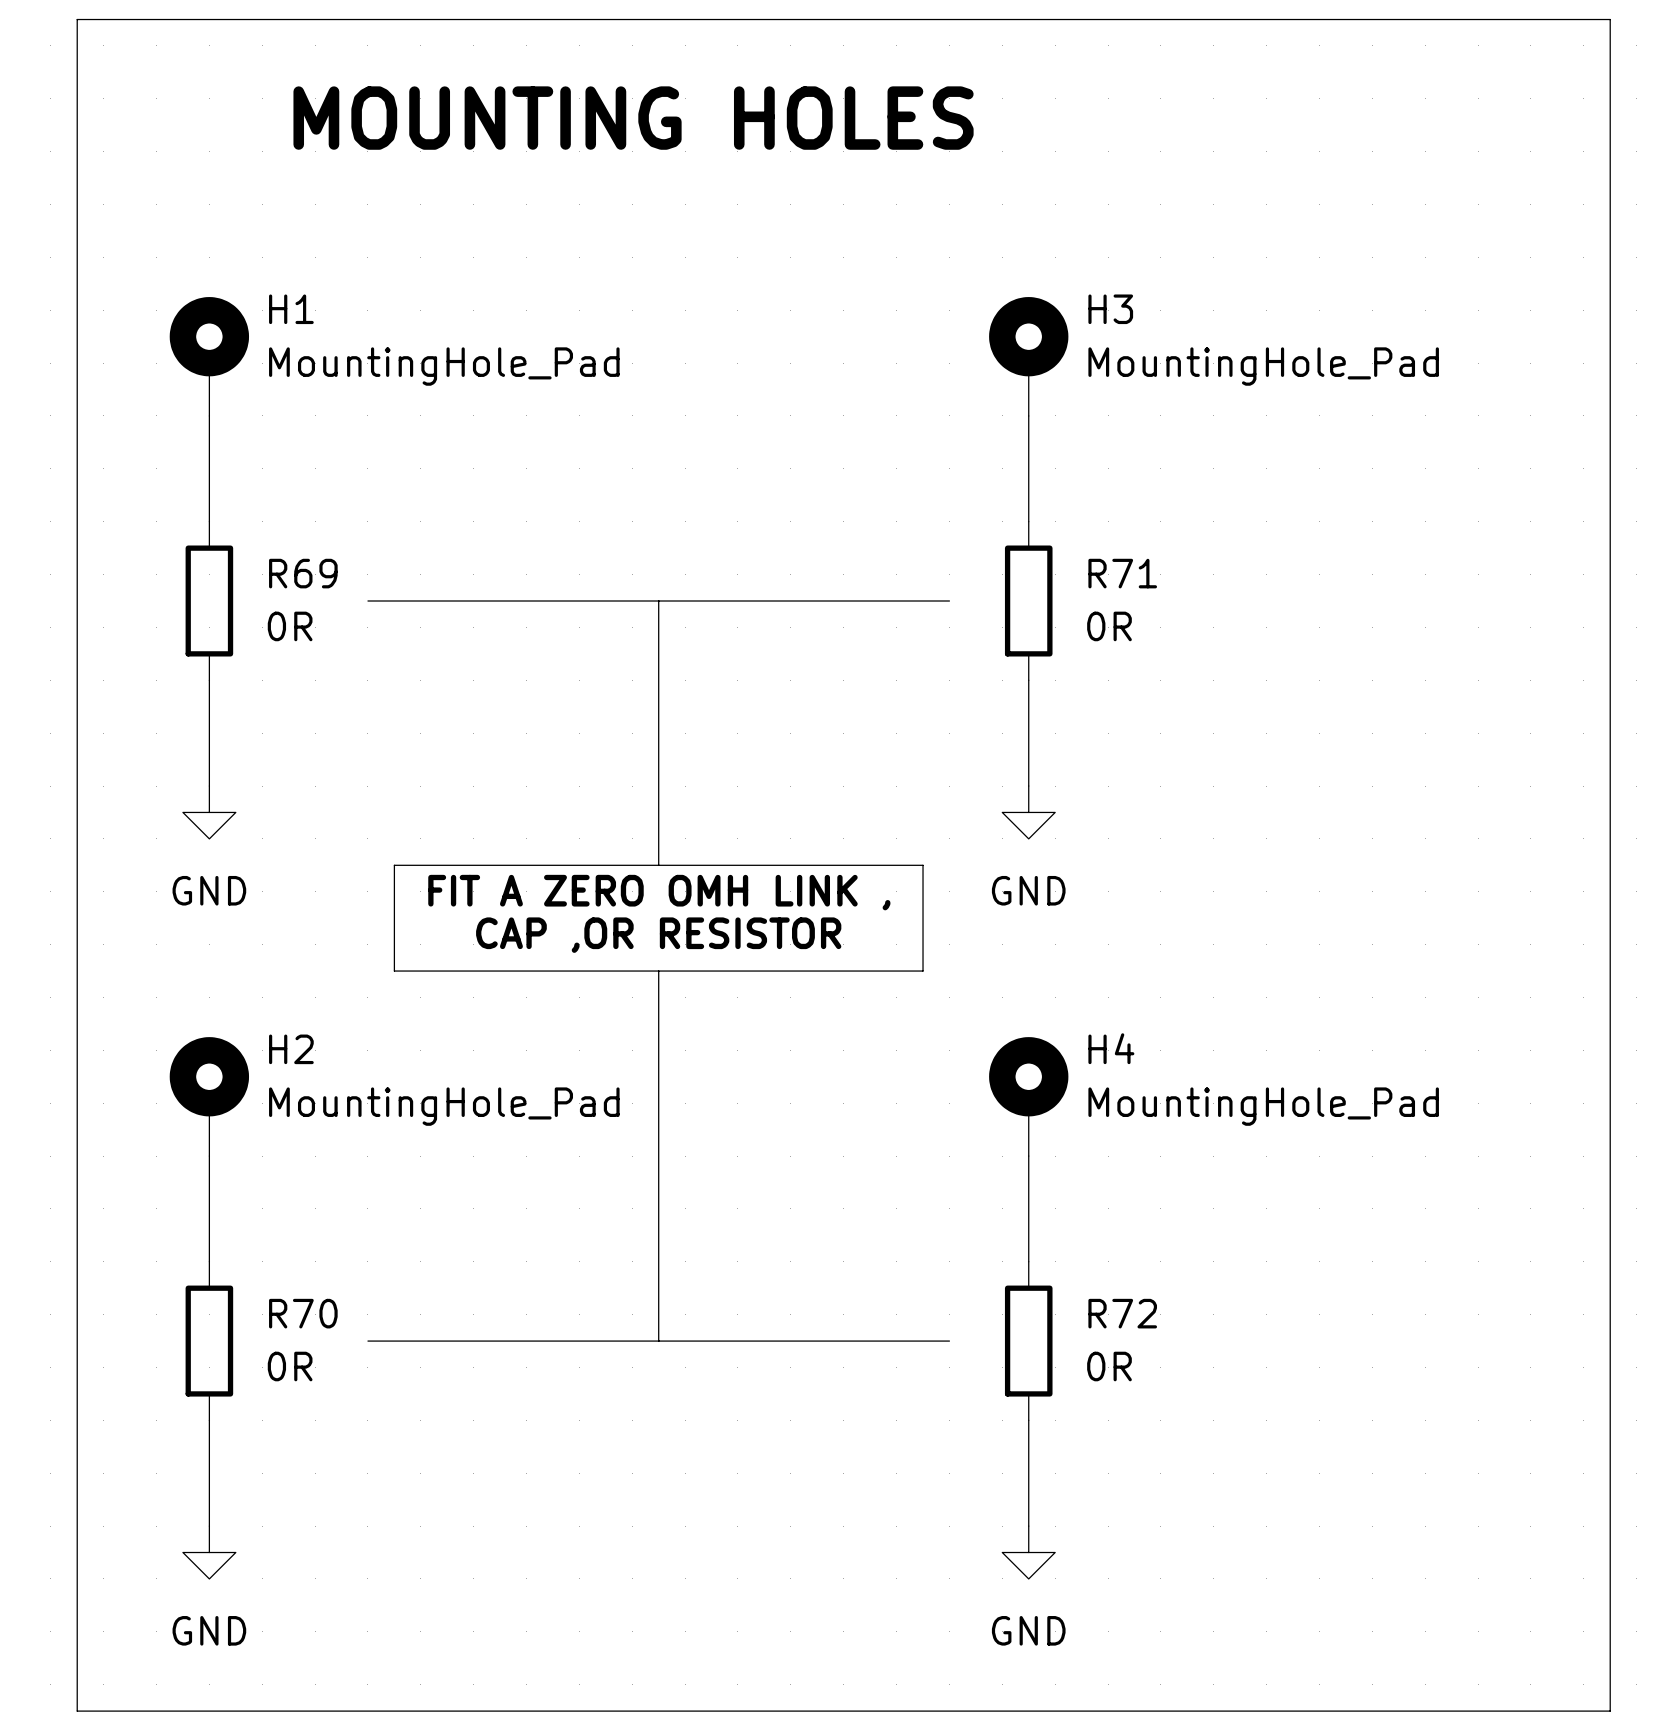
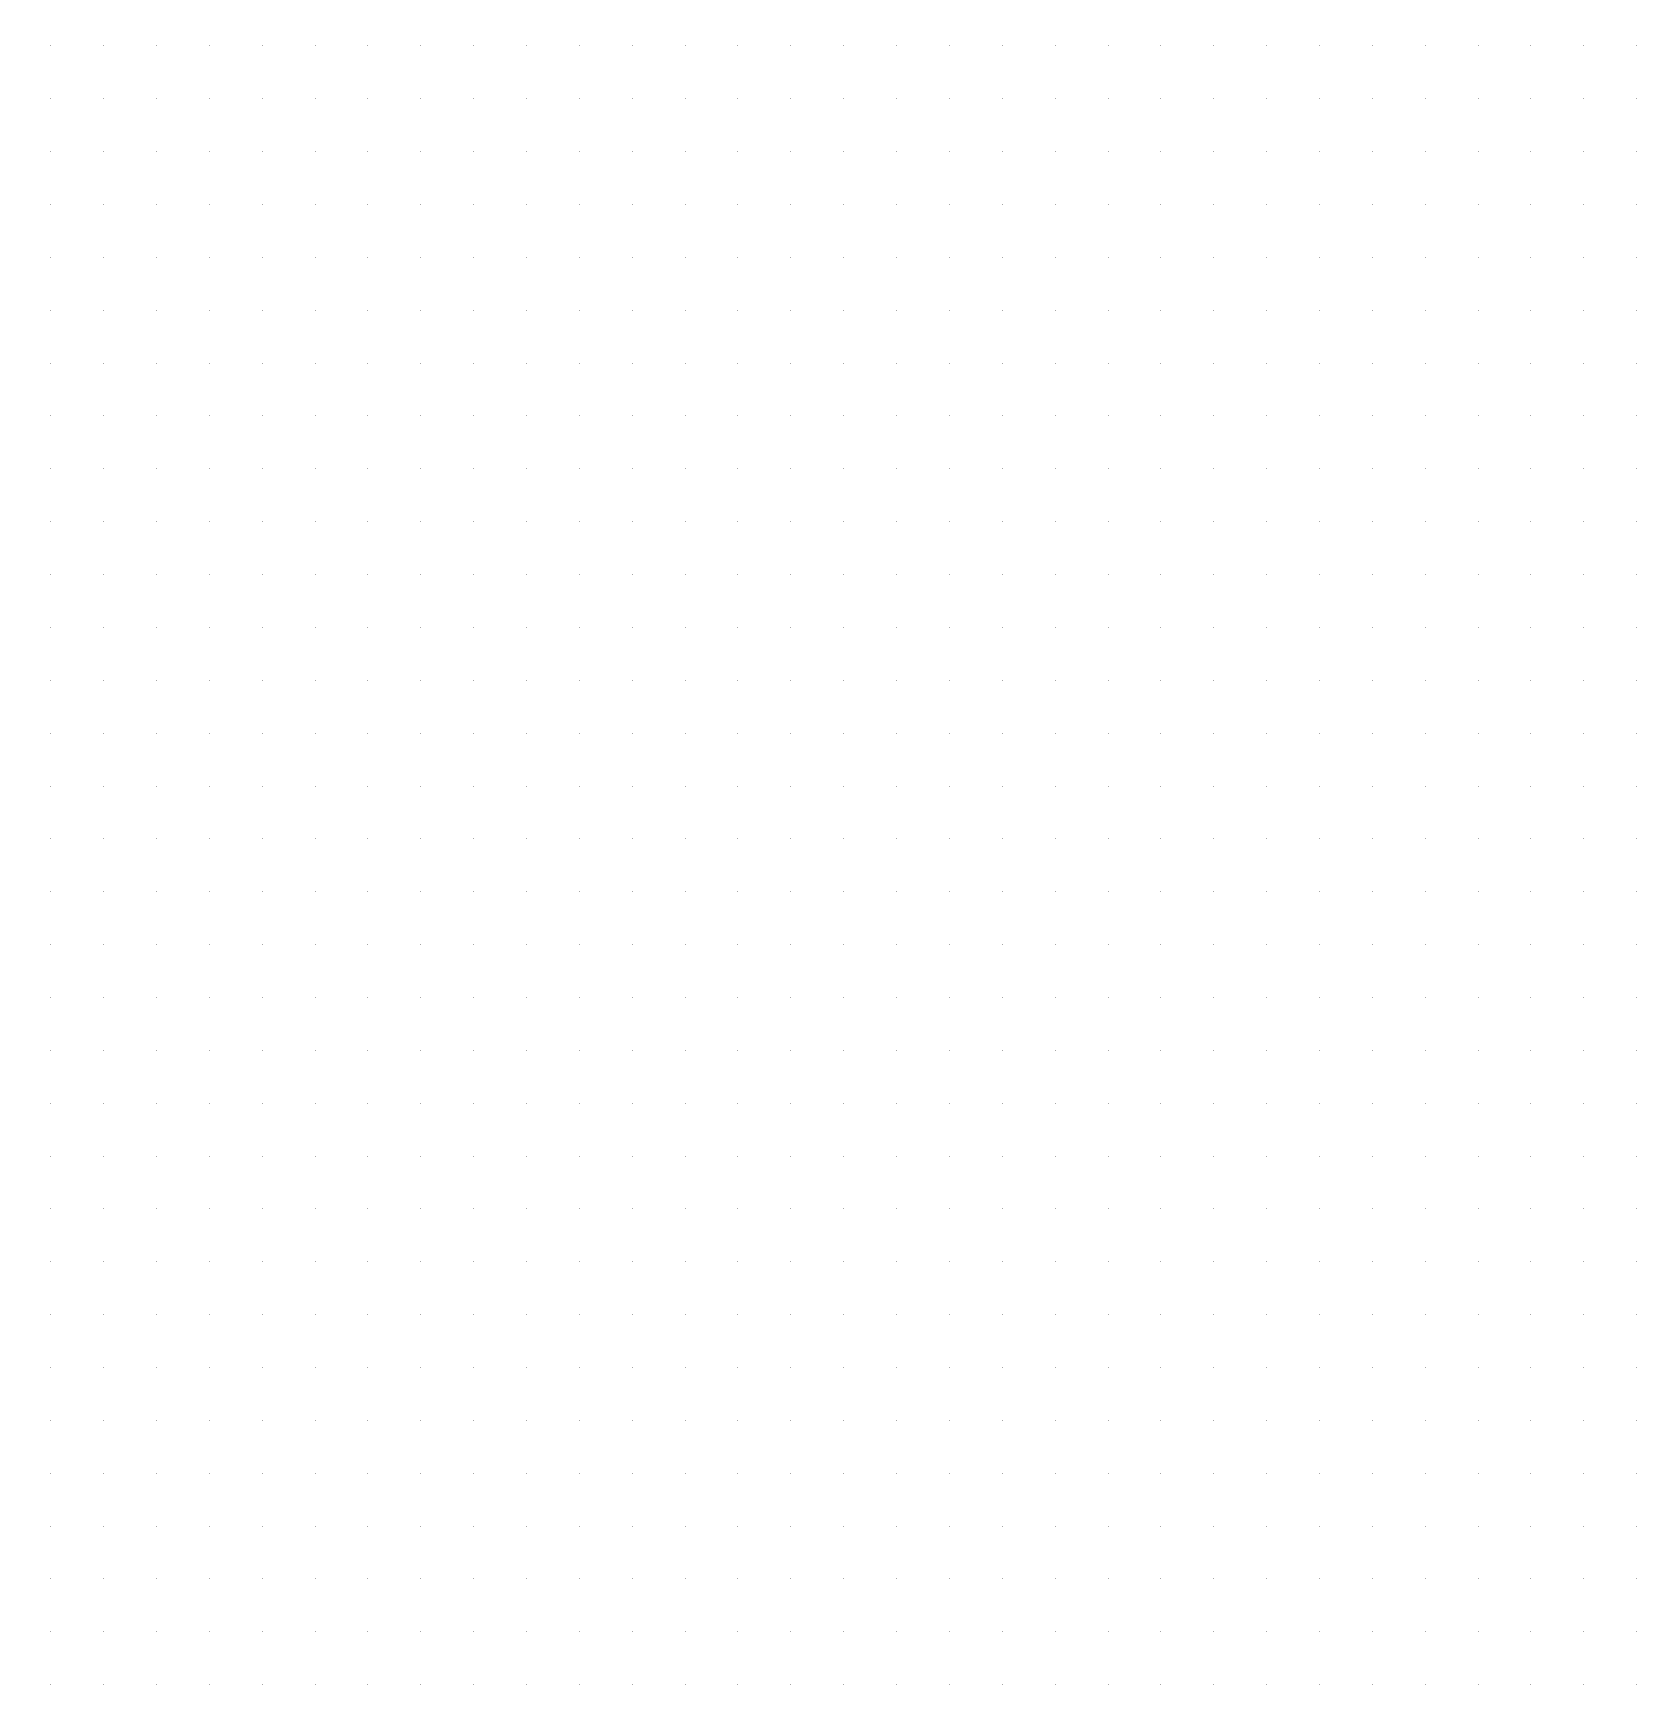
line: (77, 19) (1610, 19) (1610, 1711) (77, 1711) (77, 19) -> none
text: MOUNTING HOLES (633, 118) -> none
H1: MountingHole_Pad (209, 356) -> none
H3: MountingHole_Pad (1028, 356) -> none
wire: (209, 415) (209, 521) -> none
wire: (1028, 415) (1028, 521) -> none
R69: 0R (209, 601) -> none
line: (367, 601) (949, 601) -> none
line: (658, 601) (658, 865) -> none
R71: 0R (1028, 601) -> none
wire: (209, 680) (209, 786) -> none
wire: (1028, 680) (1028, 786) -> none
power symbol: GND (209, 812) -> none
power symbol: GND (1028, 812) -> none
line: (394, 865) (923, 865) (923, 971) (394, 971) (394, 865) -> none
text: FIT A ZERO OMH LINK , (659, 892) -> none
text: CAP ,OR RESISTOR (658, 935) -> none
line: (658, 971) (658, 1341) -> none
H2: MountingHole_Pad (209, 1096) -> none
H4: MountingHole_Pad (1028, 1096) -> none
wire: (209, 1156) (209, 1261) -> none
wire: (1028, 1156) (1028, 1261) -> none
R70: 0R (209, 1341) -> none
line: (367, 1341) (949, 1341) -> none
R72: 0R (1028, 1341) -> none
wire: (209, 1420) (209, 1526) -> none
wire: (1028, 1420) (1028, 1526) -> none
power symbol: GND (209, 1552) -> none
power symbol: GND (1028, 1552) -> none

